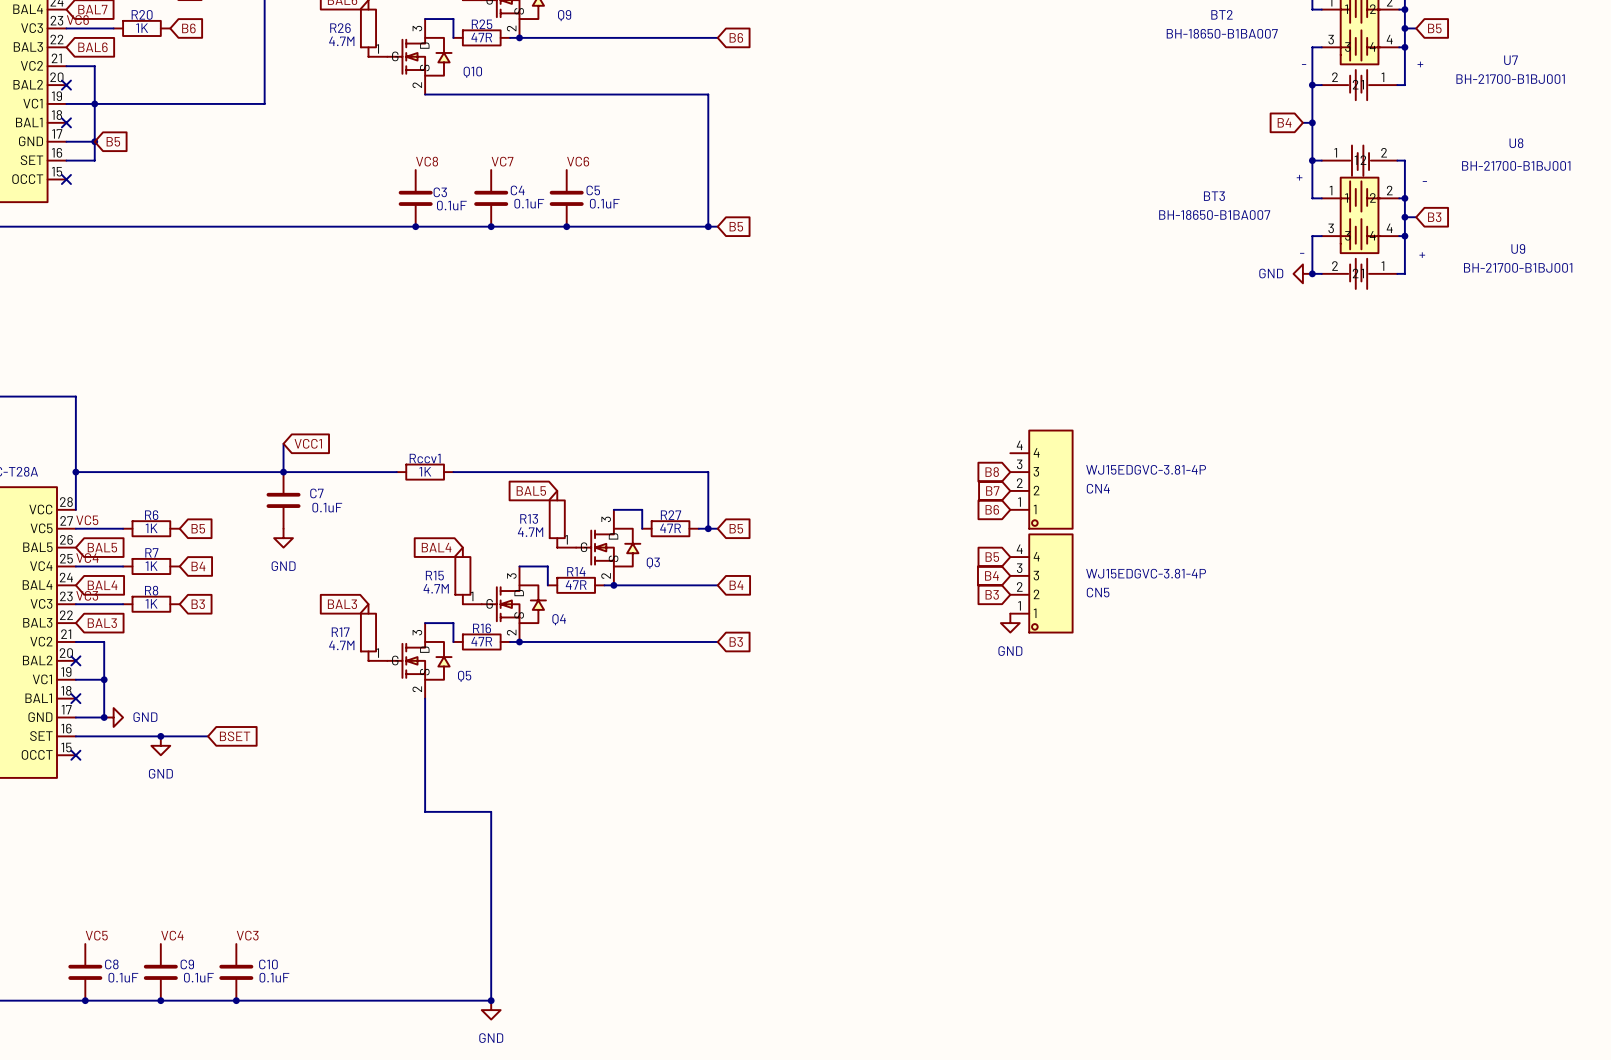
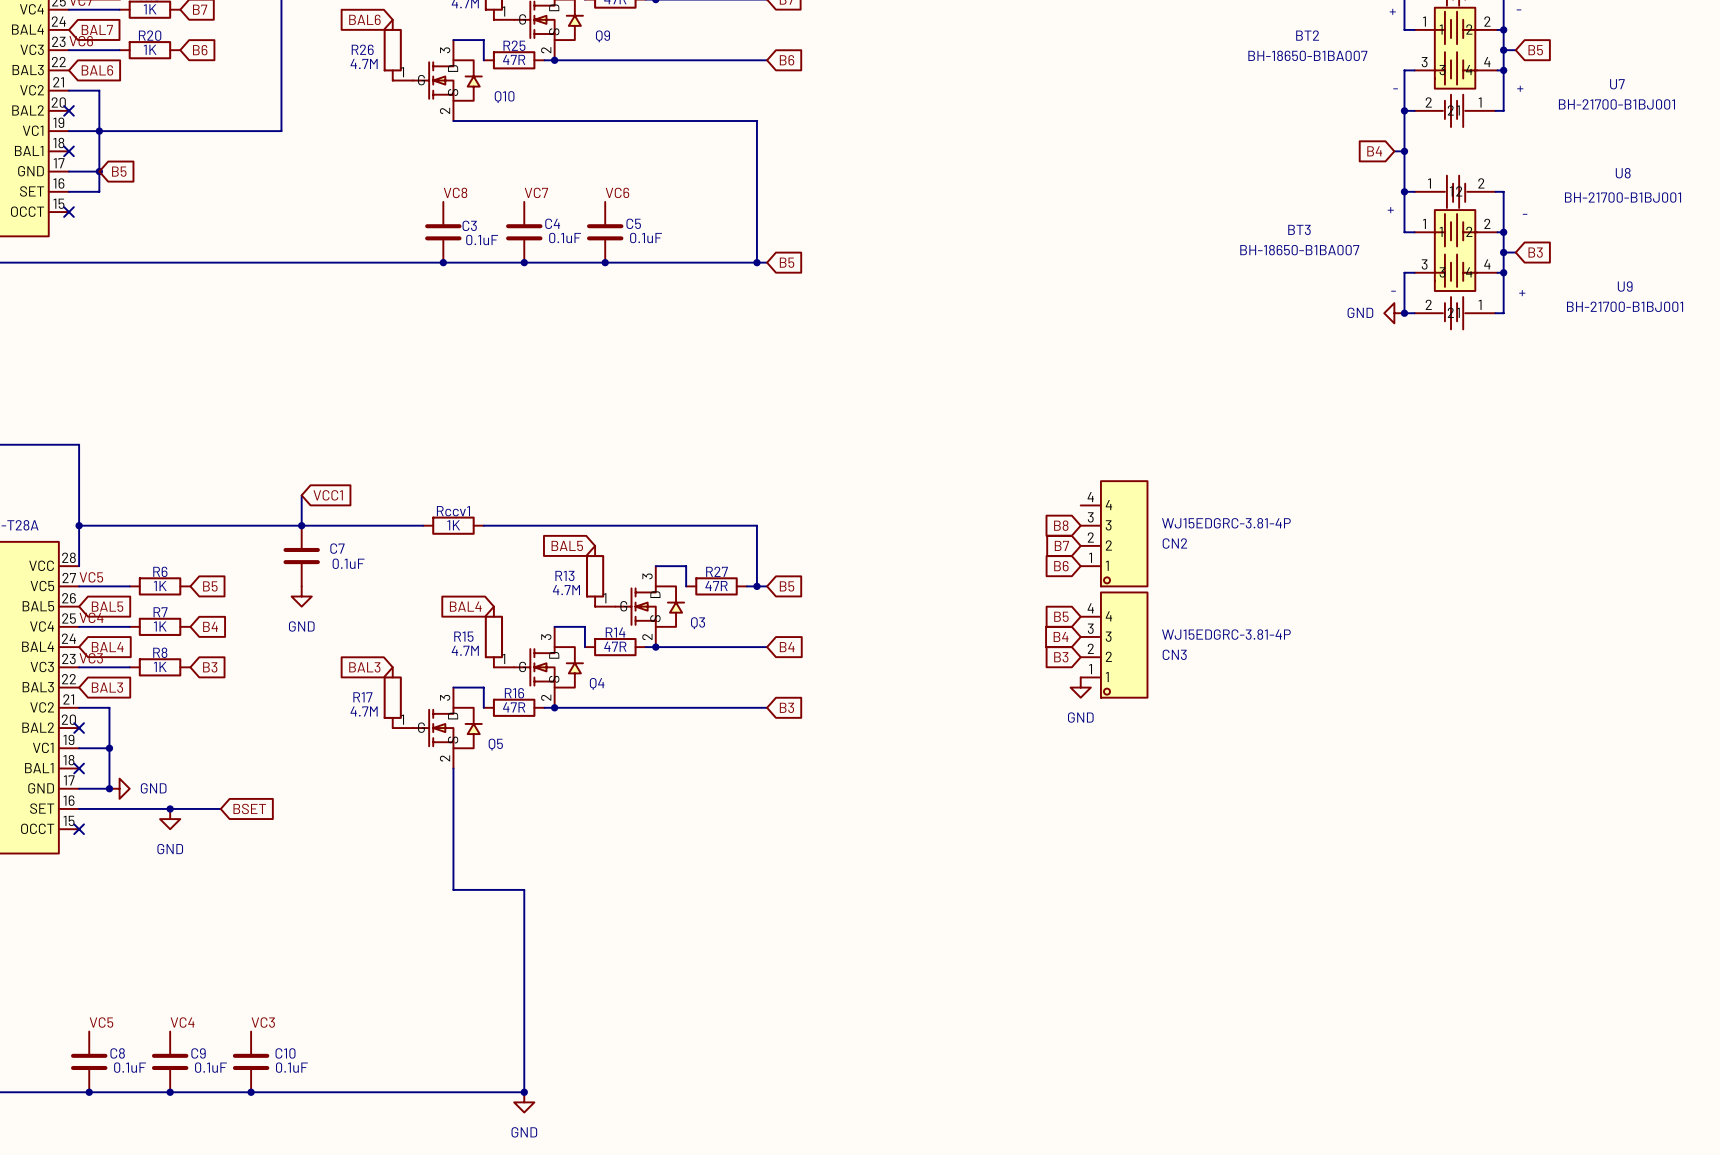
CN4 value: WJ15EDGVC-3.81-4P (1146, 469) -> WJ15EDGRC-3.81-4P (1226, 523)
CN4 name: CN4 (1098, 488) -> CN2 (1174, 543)
CN5 value: WJ15EDGVC-3.81-4P (1146, 573) -> WJ15EDGRC-3.81-4P (1226, 634)
CN5 name: CN5 (1098, 592) -> CN3 (1174, 654)

